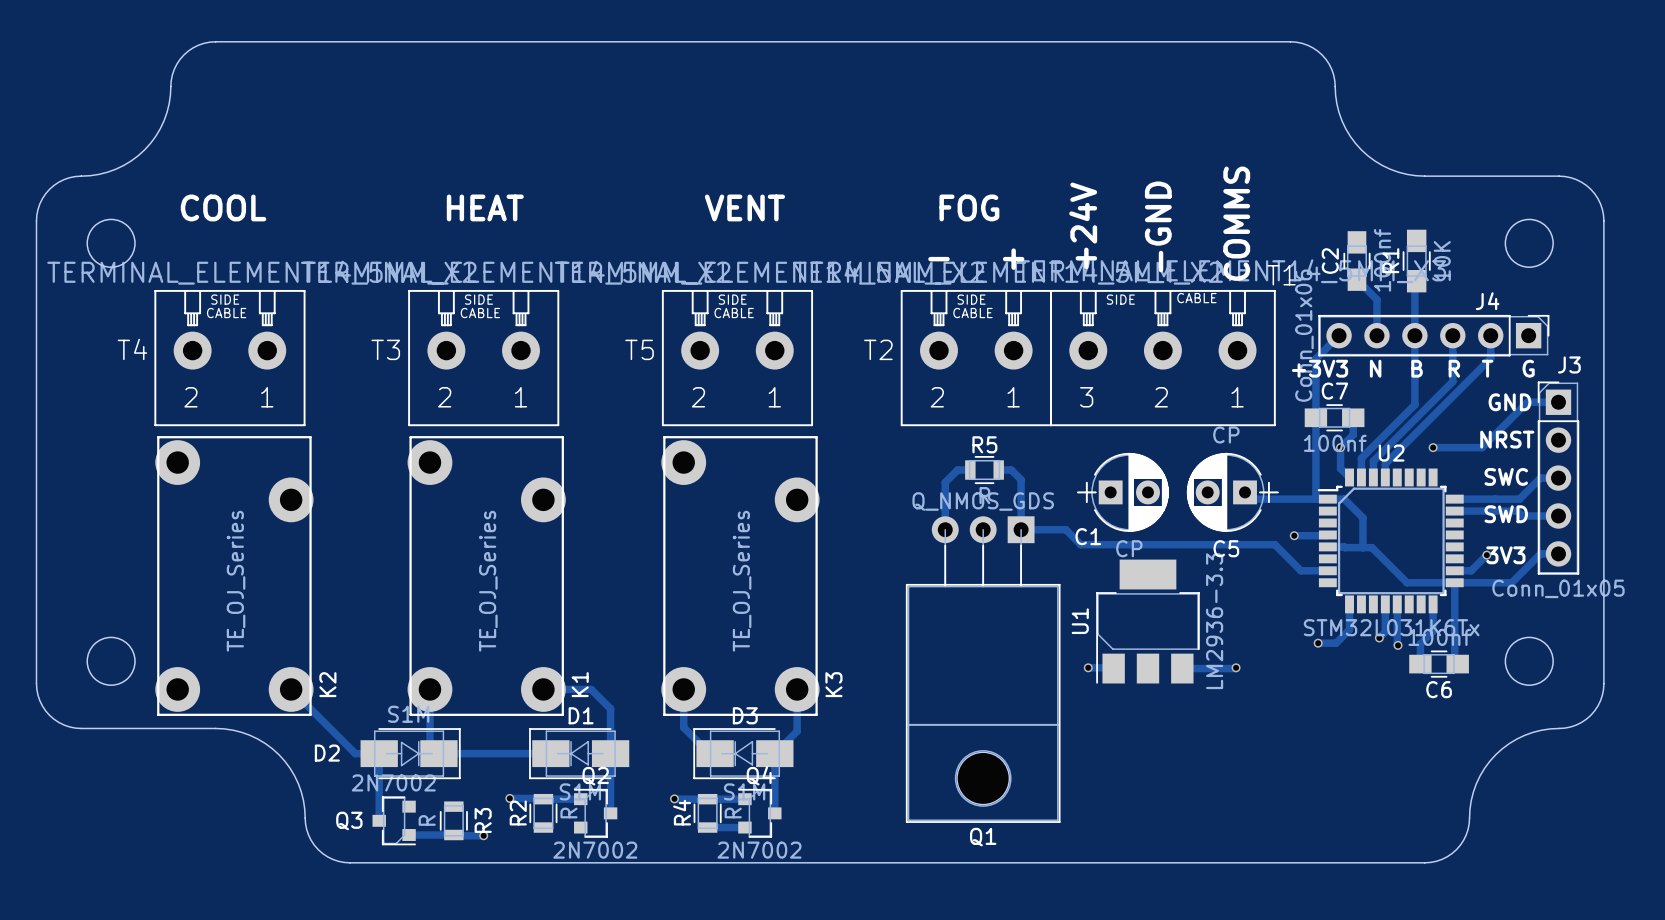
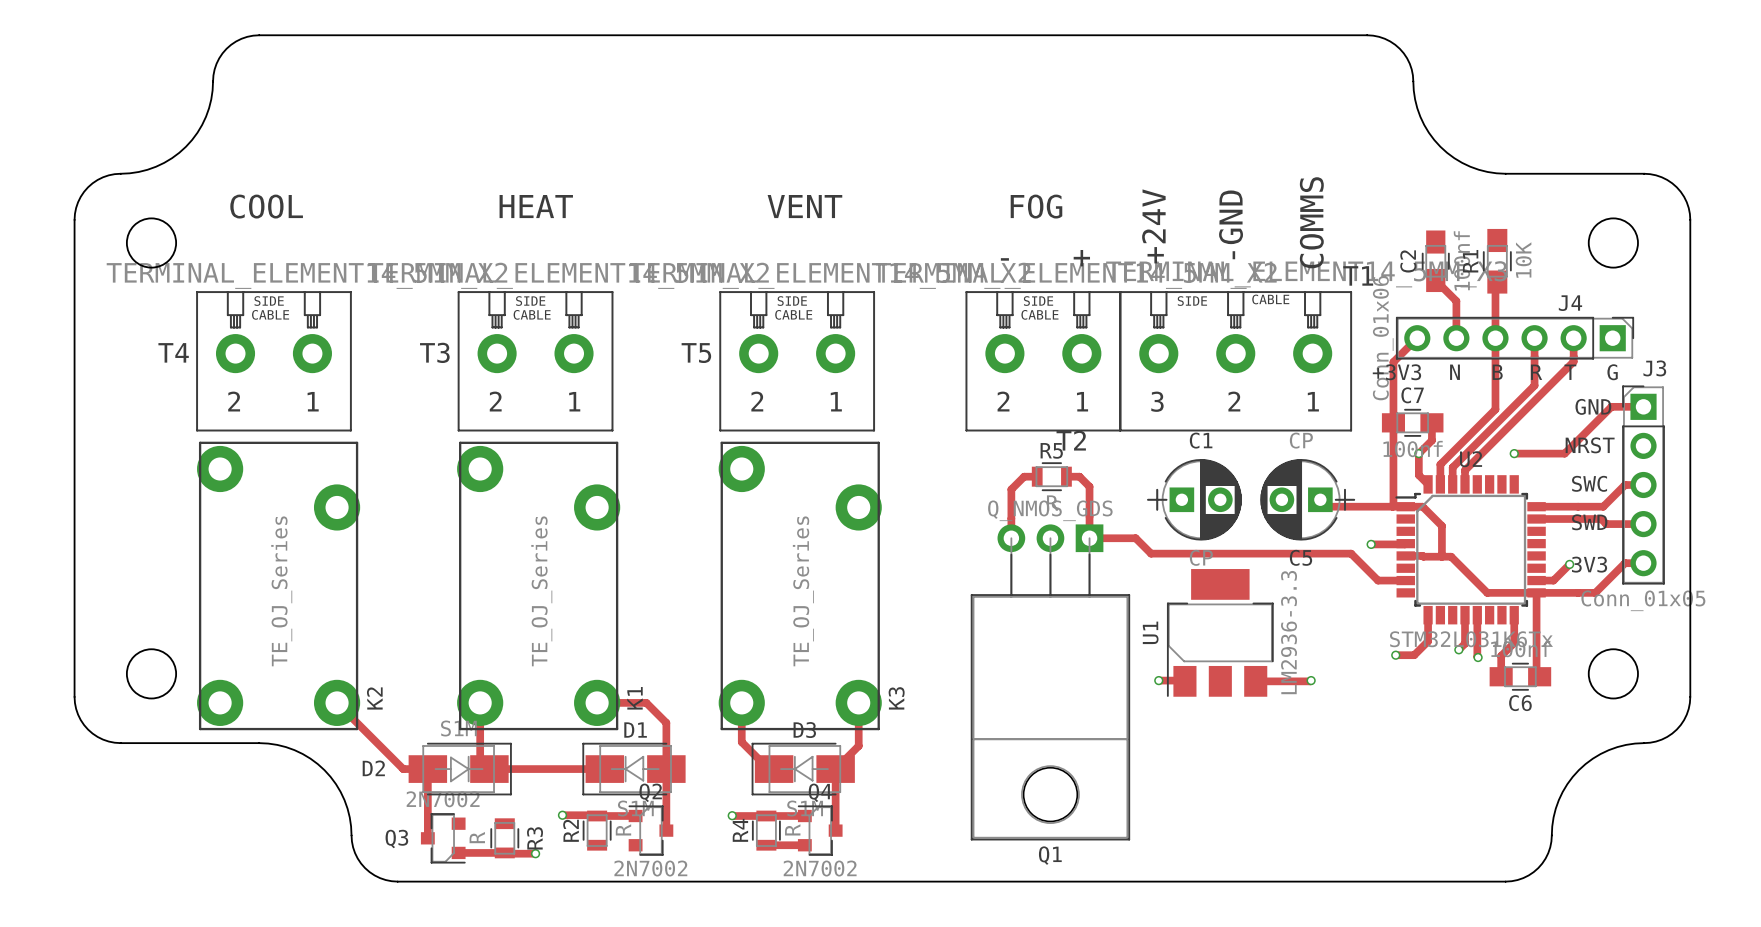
T2 name position: T2 (878, 349) -> T2 (1071, 440)
C1 name position: C1 (1088, 536) -> C1 (1201, 440)

